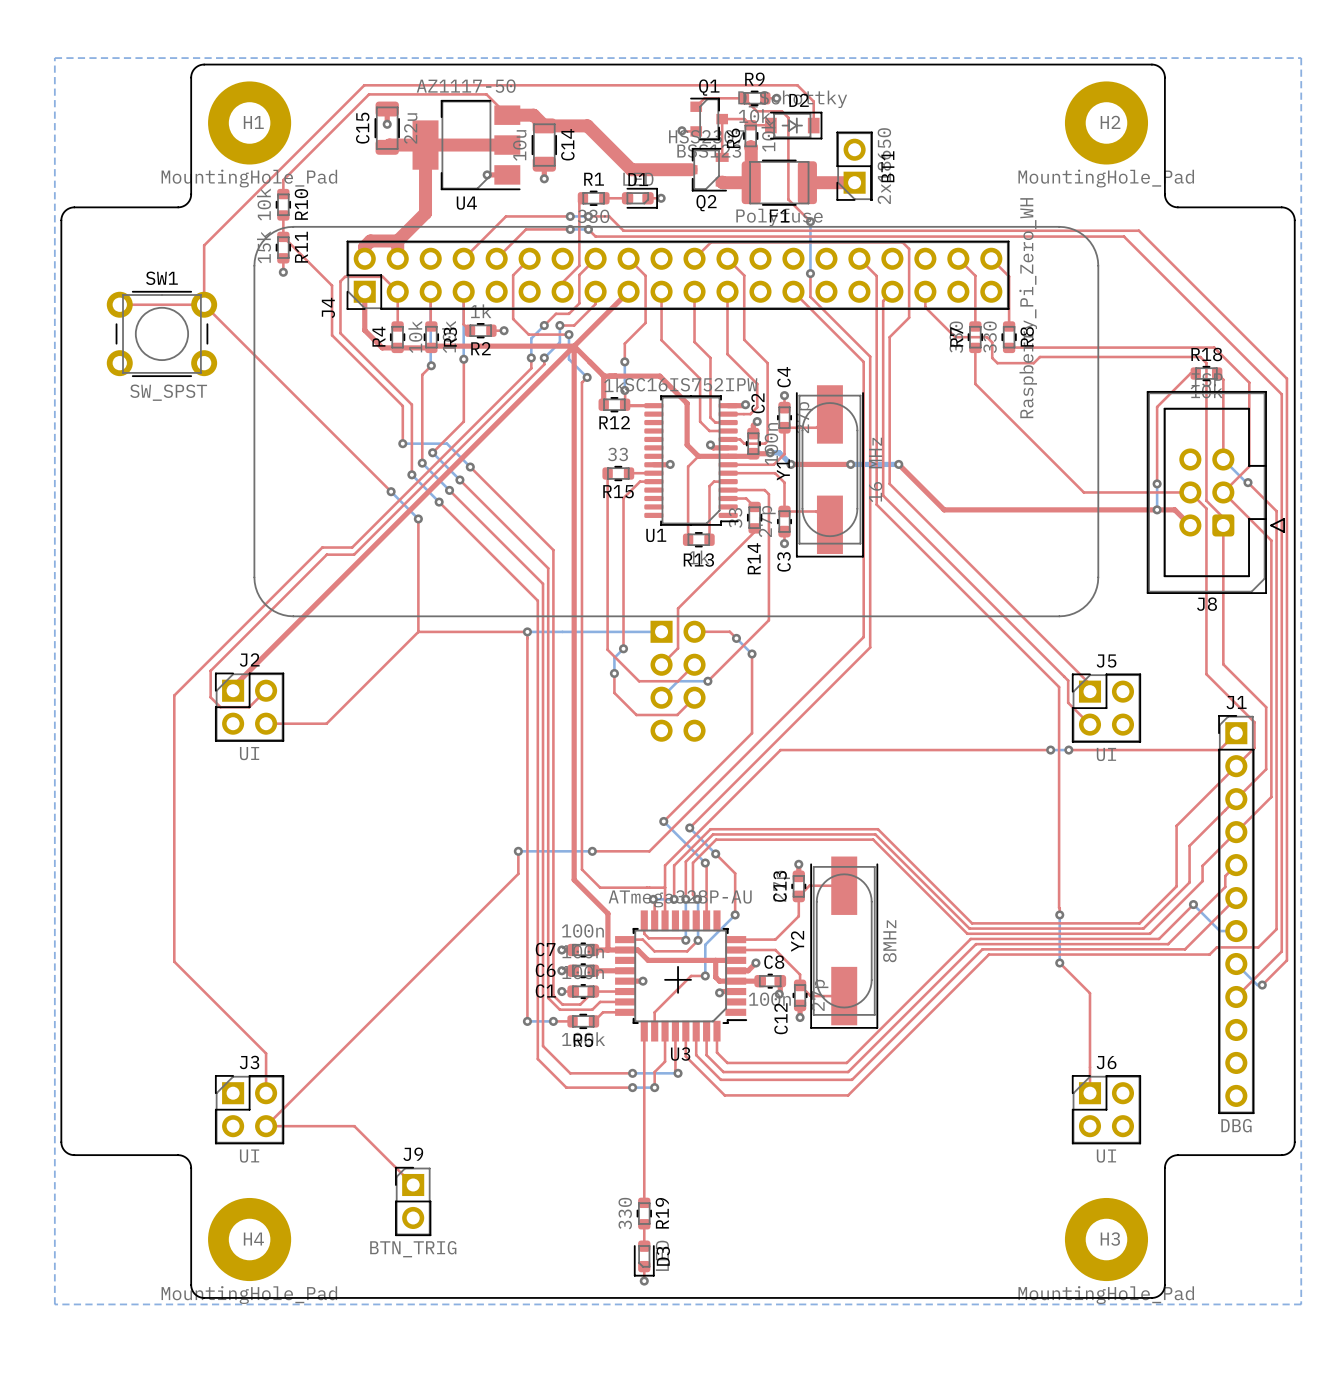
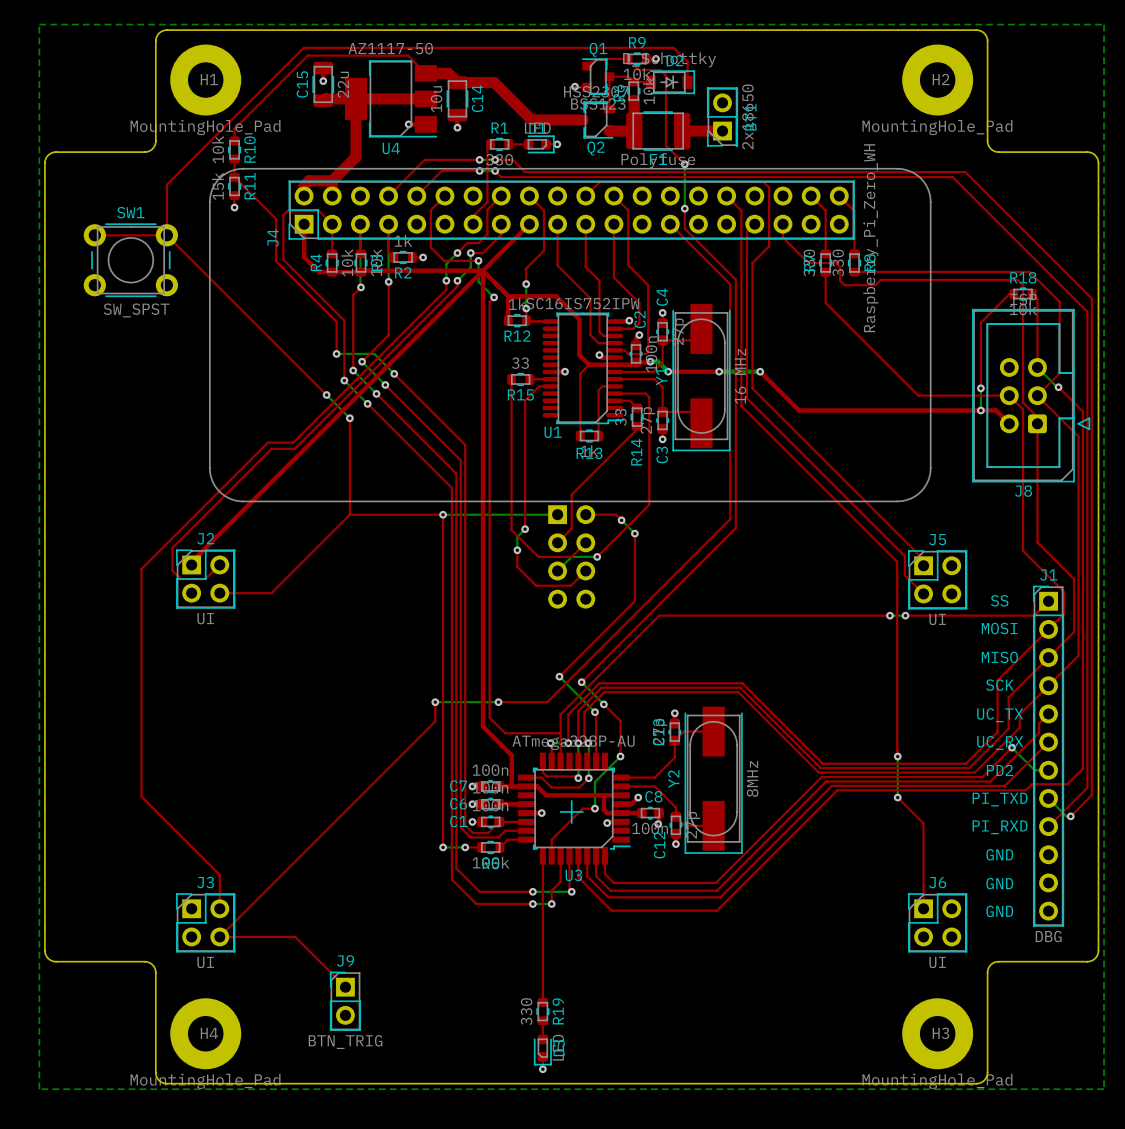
text: none -> SS (999, 600)
text: none -> MOSI (999, 628)
text: none -> MISO (999, 657)
text: none -> SCK (999, 685)
text: none -> UC_TX (1000, 715)
text: none -> UC_RX (1000, 742)
text: none -> PD2 (999, 770)
text: none -> PI_TXD (1000, 799)
text: none -> PI_RXD (1000, 827)
text: none -> GND (999, 854)
text: none -> GND (999, 883)
text: none -> GND (999, 911)

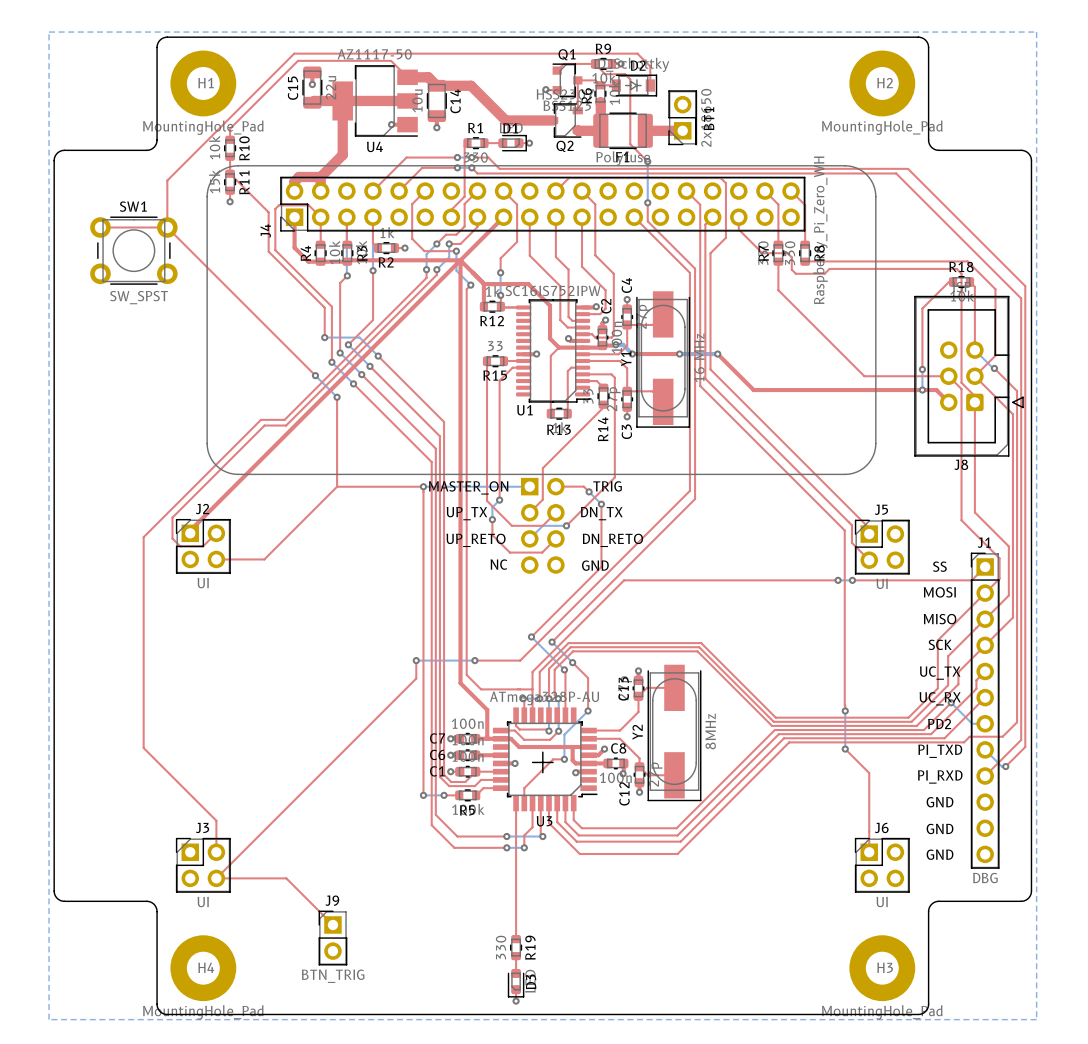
text: none -> TRIG (607, 486)
text: none -> MASTER_ON (468, 487)
text: none -> UP_TX (466, 513)
text: none -> DN_TX (601, 513)
text: none -> UP_RETO (476, 540)
text: none -> DN_RETO (612, 540)
text: none -> NC (498, 564)
text: none -> GND (595, 565)

